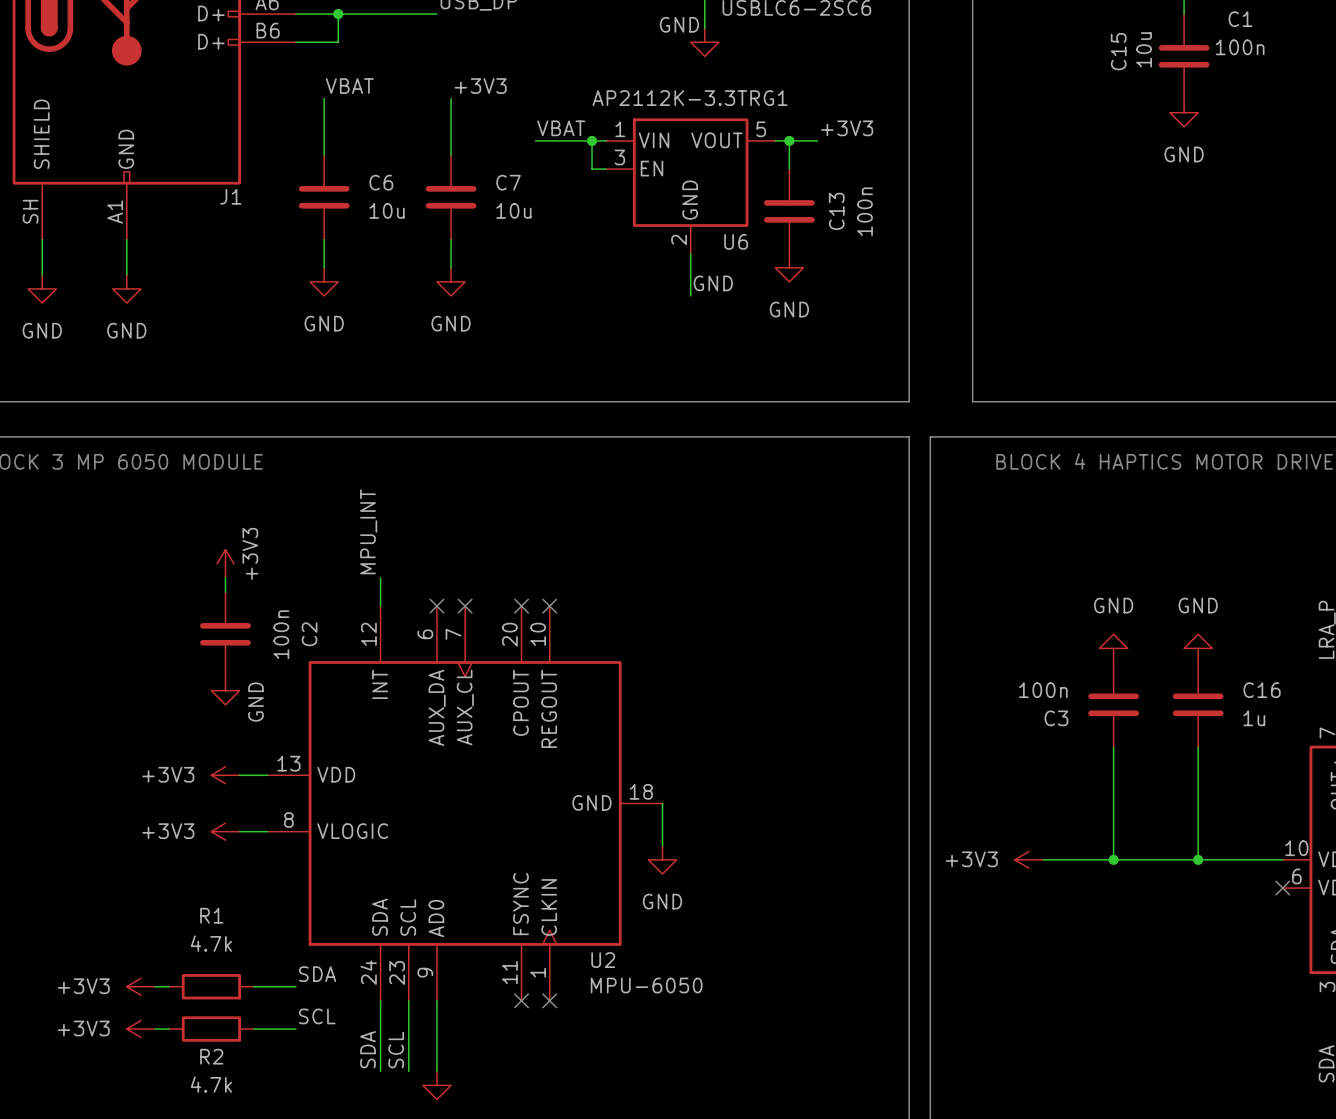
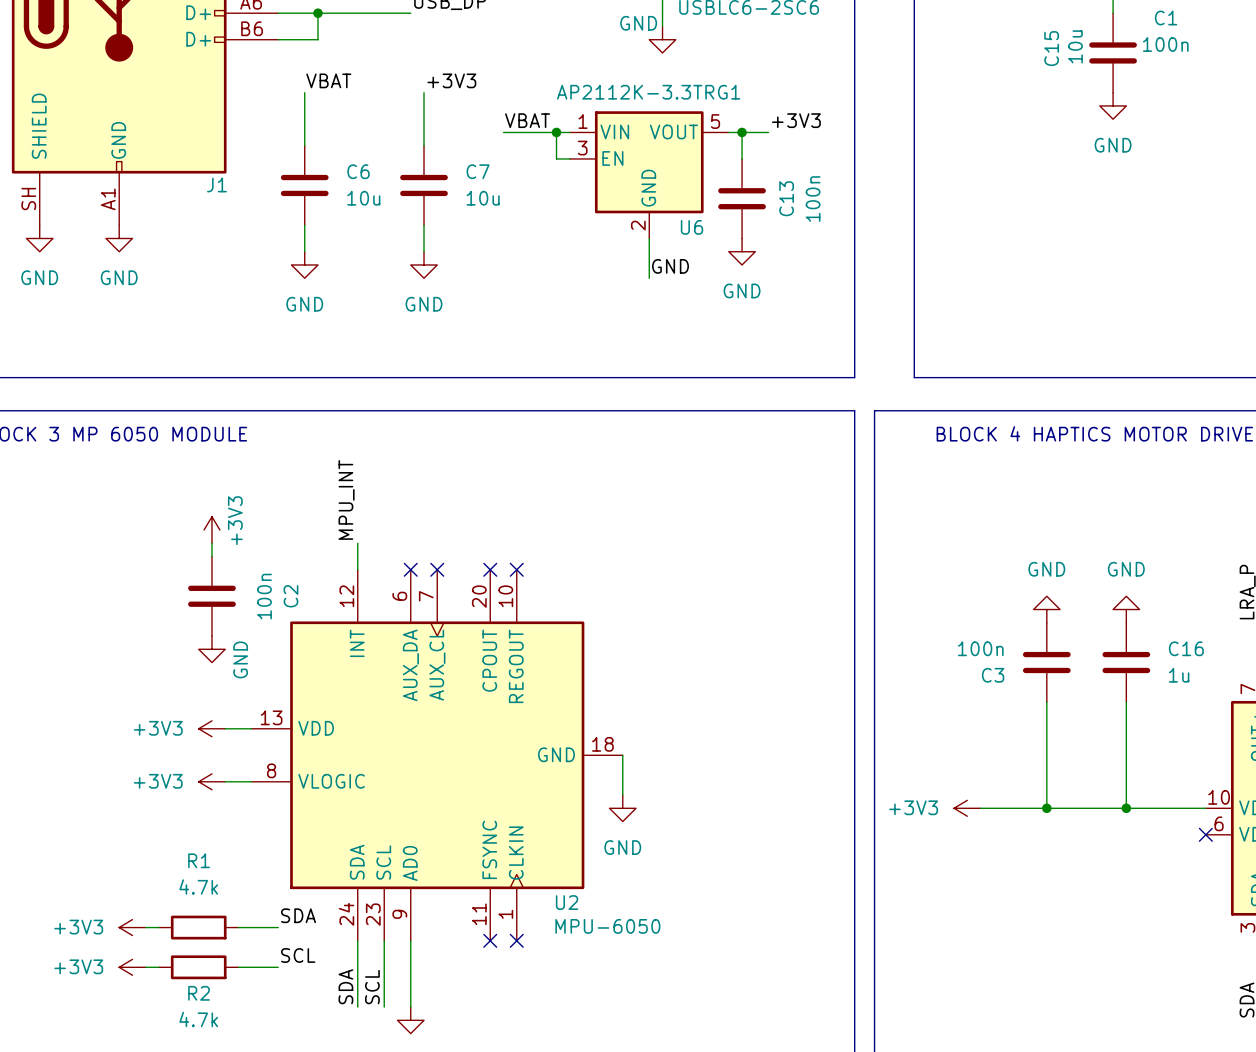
wire: (42, 239) (42, 274) -> none
wire: (126, 239) (126, 274) -> none
power symbol position: GND (42, 288) -> GND (39, 238)
power symbol position: GND (126, 288) -> GND (119, 238)

